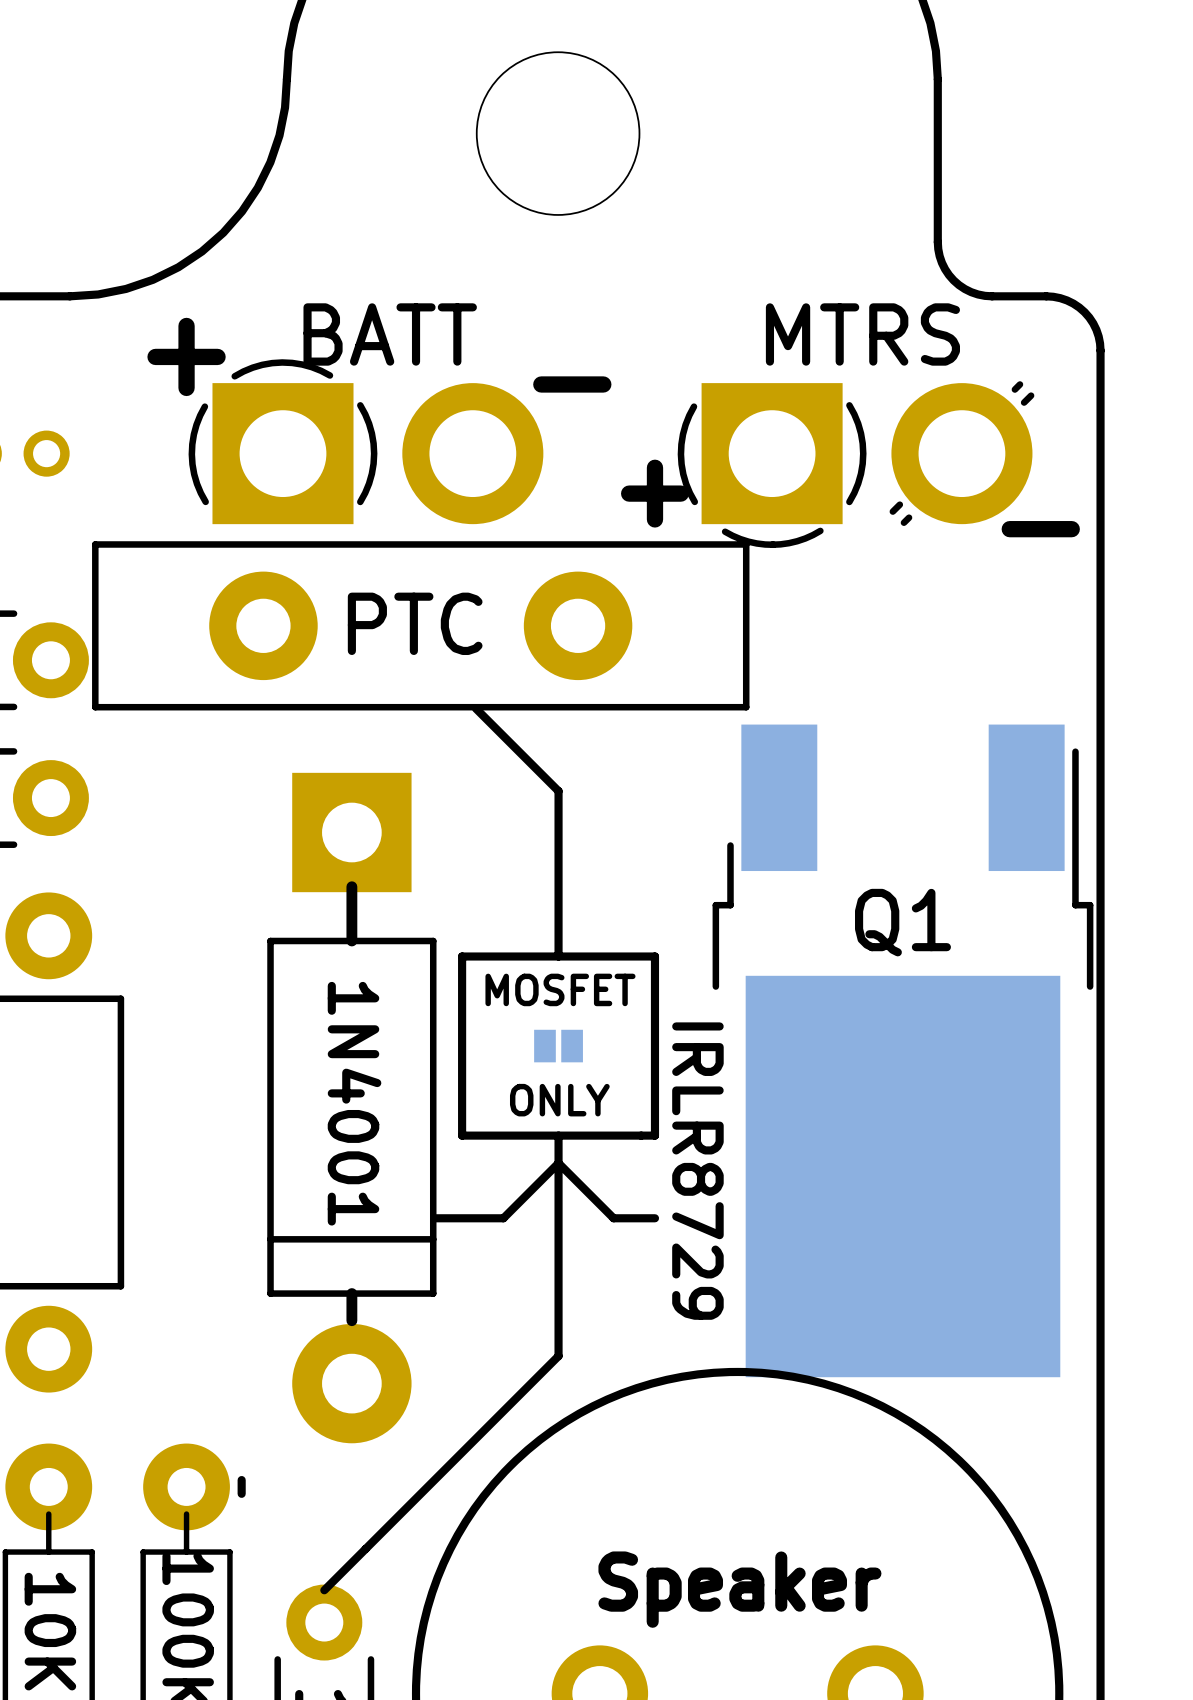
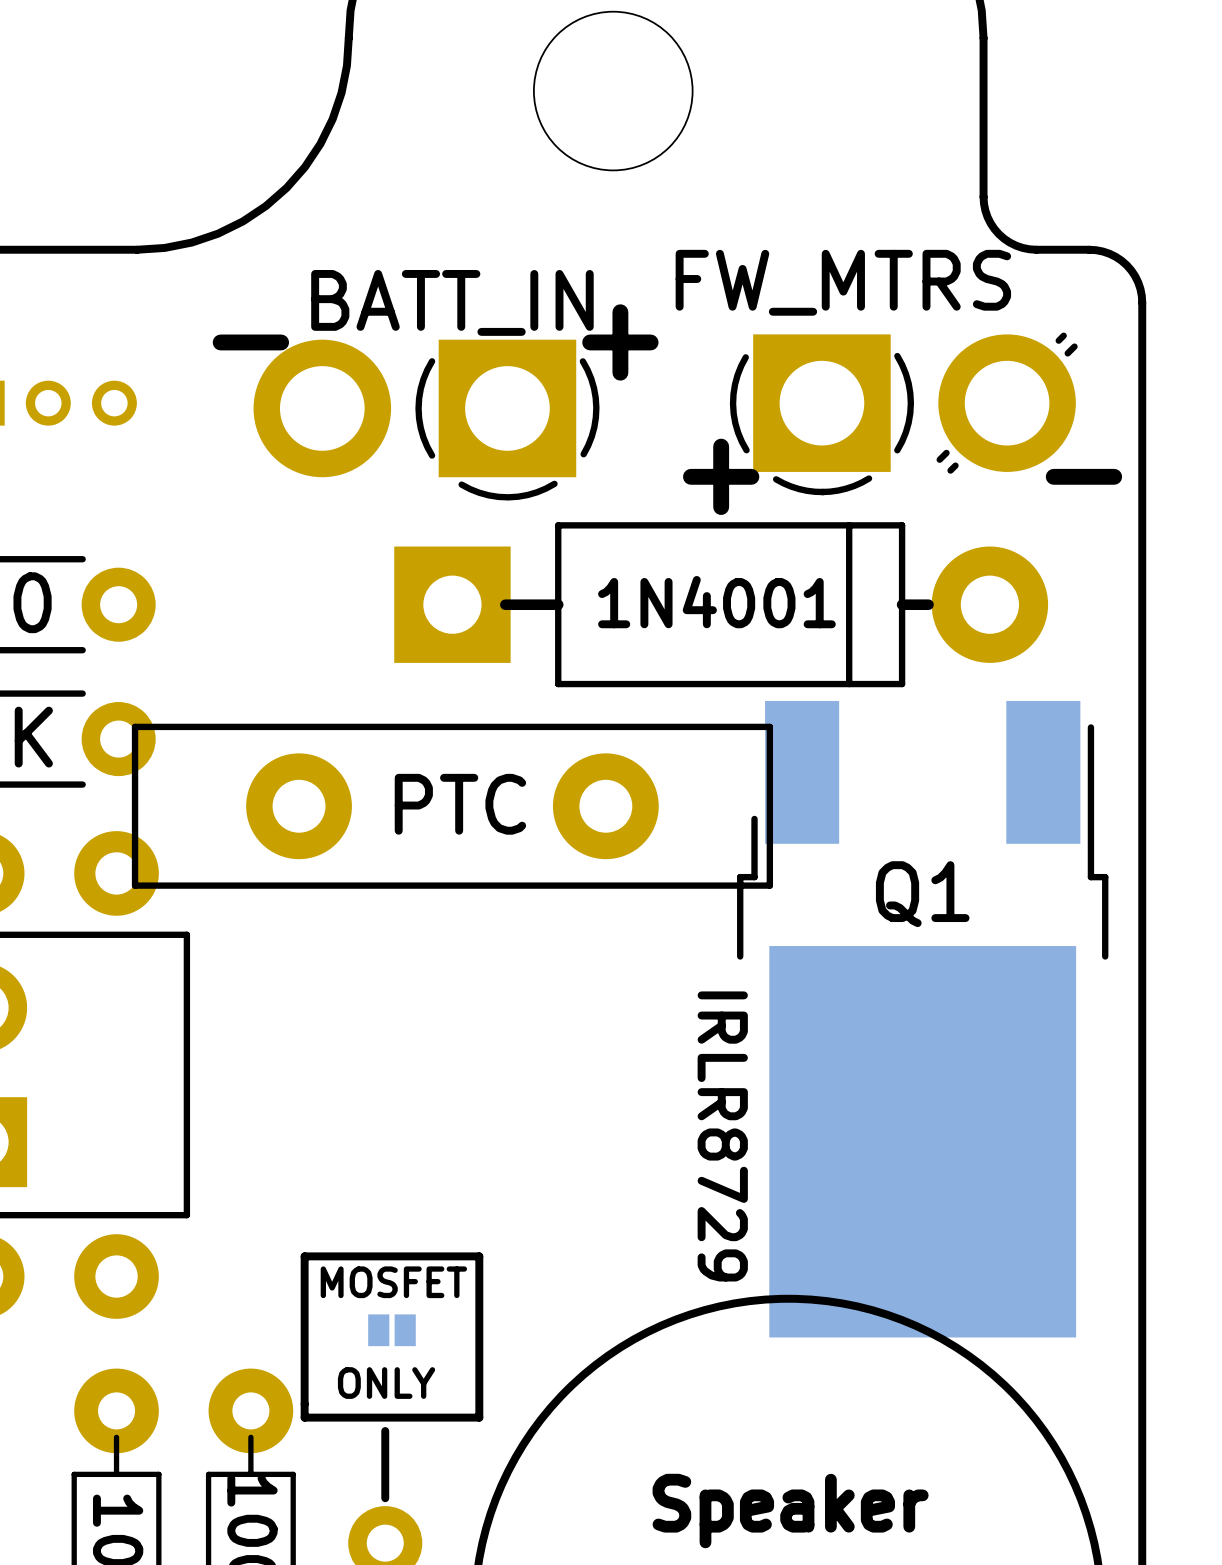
part value: BATT (390, 334) -> BATT_IN (452, 302)
part value: MTRS (862, 334) -> FW_MTRS (843, 282)
text position: + (186, 356) -> + (620, 342)
text position: - (572, 384) -> - (250, 342)
part rotation: 0° (365, 441) -> 180° (426, 420)
text position: + (654, 493) -> + (721, 476)
part value position: PTC (415, 623) -> PTC (460, 804)
part position: (420, 625) -> (452, 806)
line: (475, 708) (558, 791) (558, 956) -> none
line: (654, 956) (654, 1135) (462, 1135) (462, 956) (654, 956) -> none
text position: MOSFET (560, 989) -> MOSFET (393, 1282)
part position: (558, 1046) -> (391, 1330)
Q1 position: (902, 1050) -> (922, 1019)
text position: ONLY (559, 1100) -> ONLY (386, 1383)
part rotation: 0° (351, 1108) -> 90° counterclockwise (721, 604)
part position: (351, 1108) -> (721, 604)
line: (558, 1135) (558, 1356) (324, 1590) -> none
line: (654, 1218) (613, 1218) (558, 1163) (503, 1218) (434, 1218) -> none
line: none -> (304, 1404) (304, 1256) (479, 1256) (479, 1417) (304, 1417)
line: none -> (385, 1431) (385, 1498)

